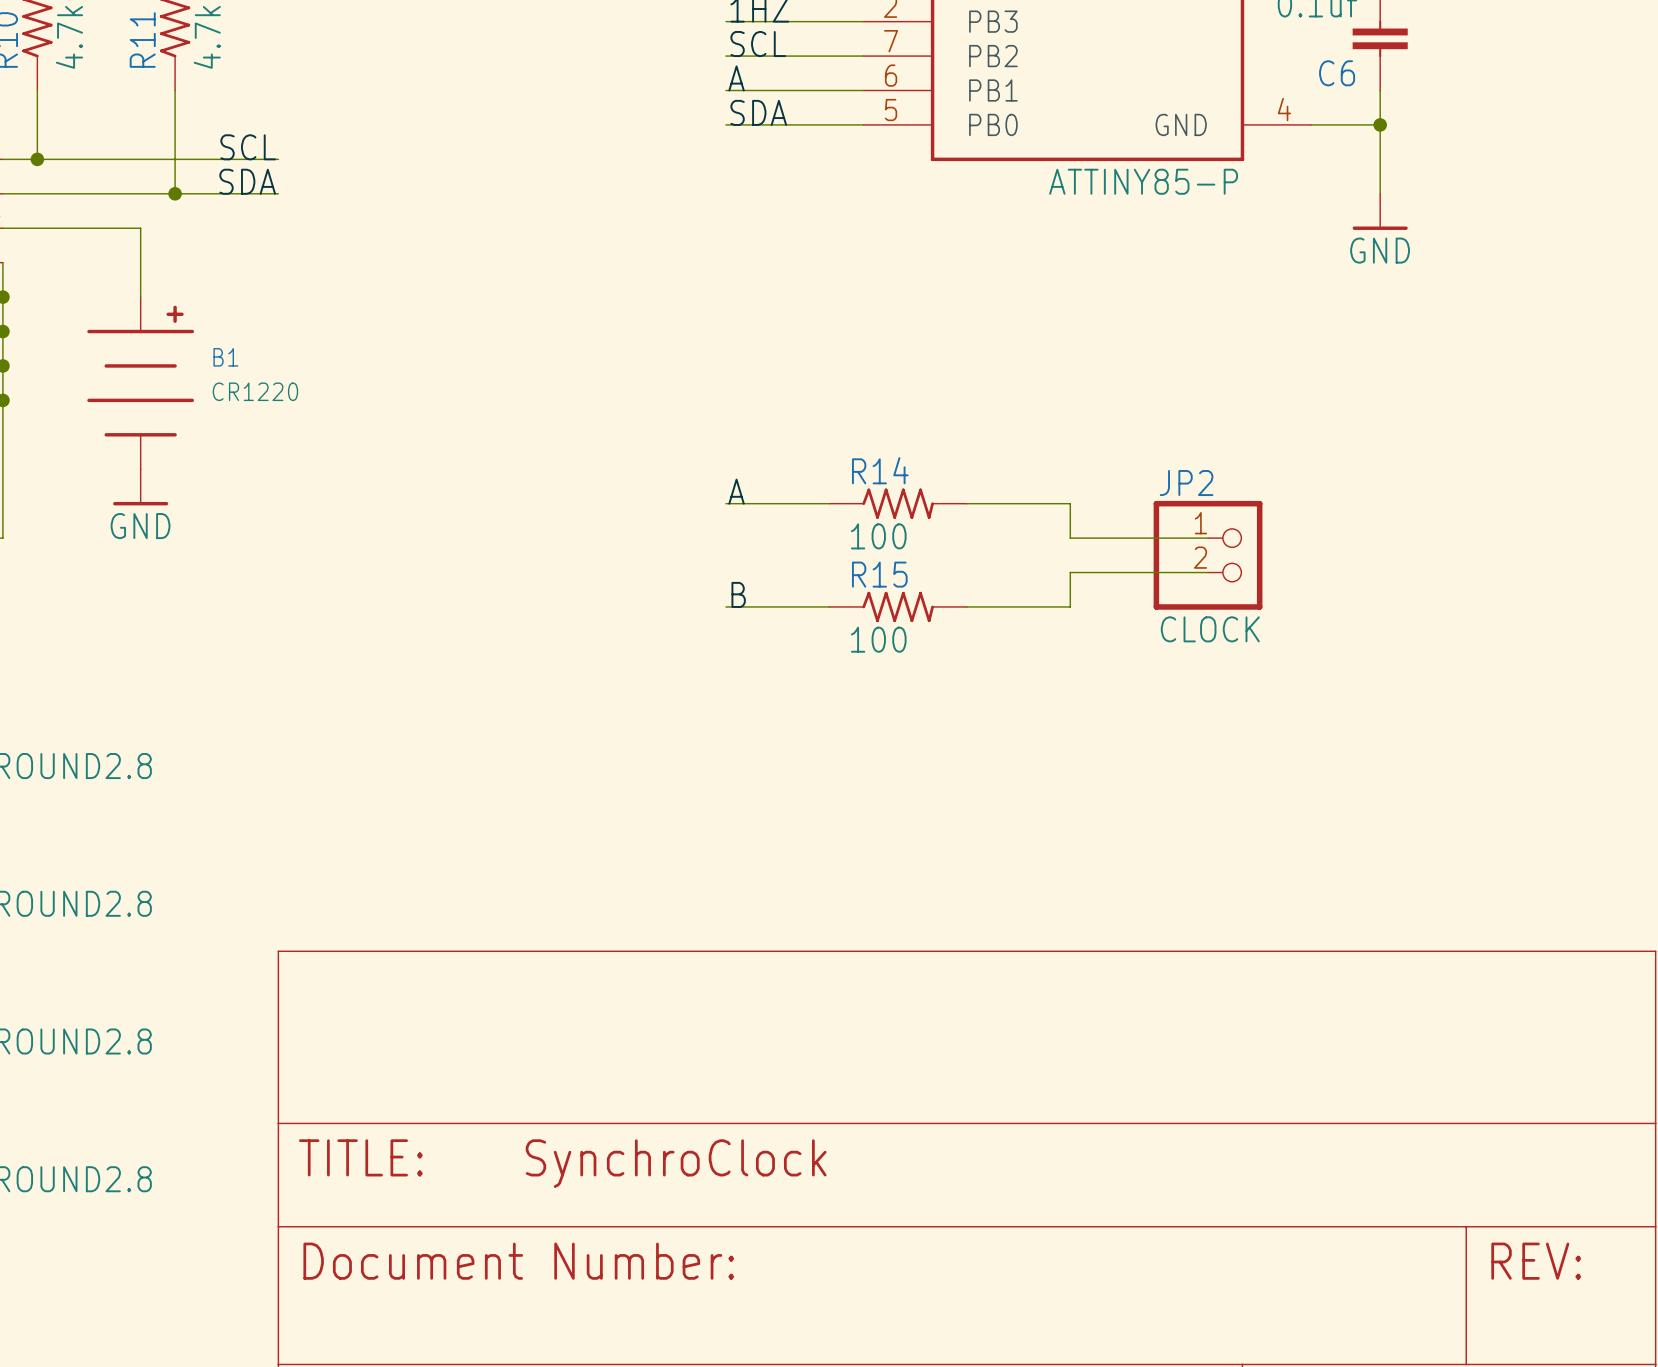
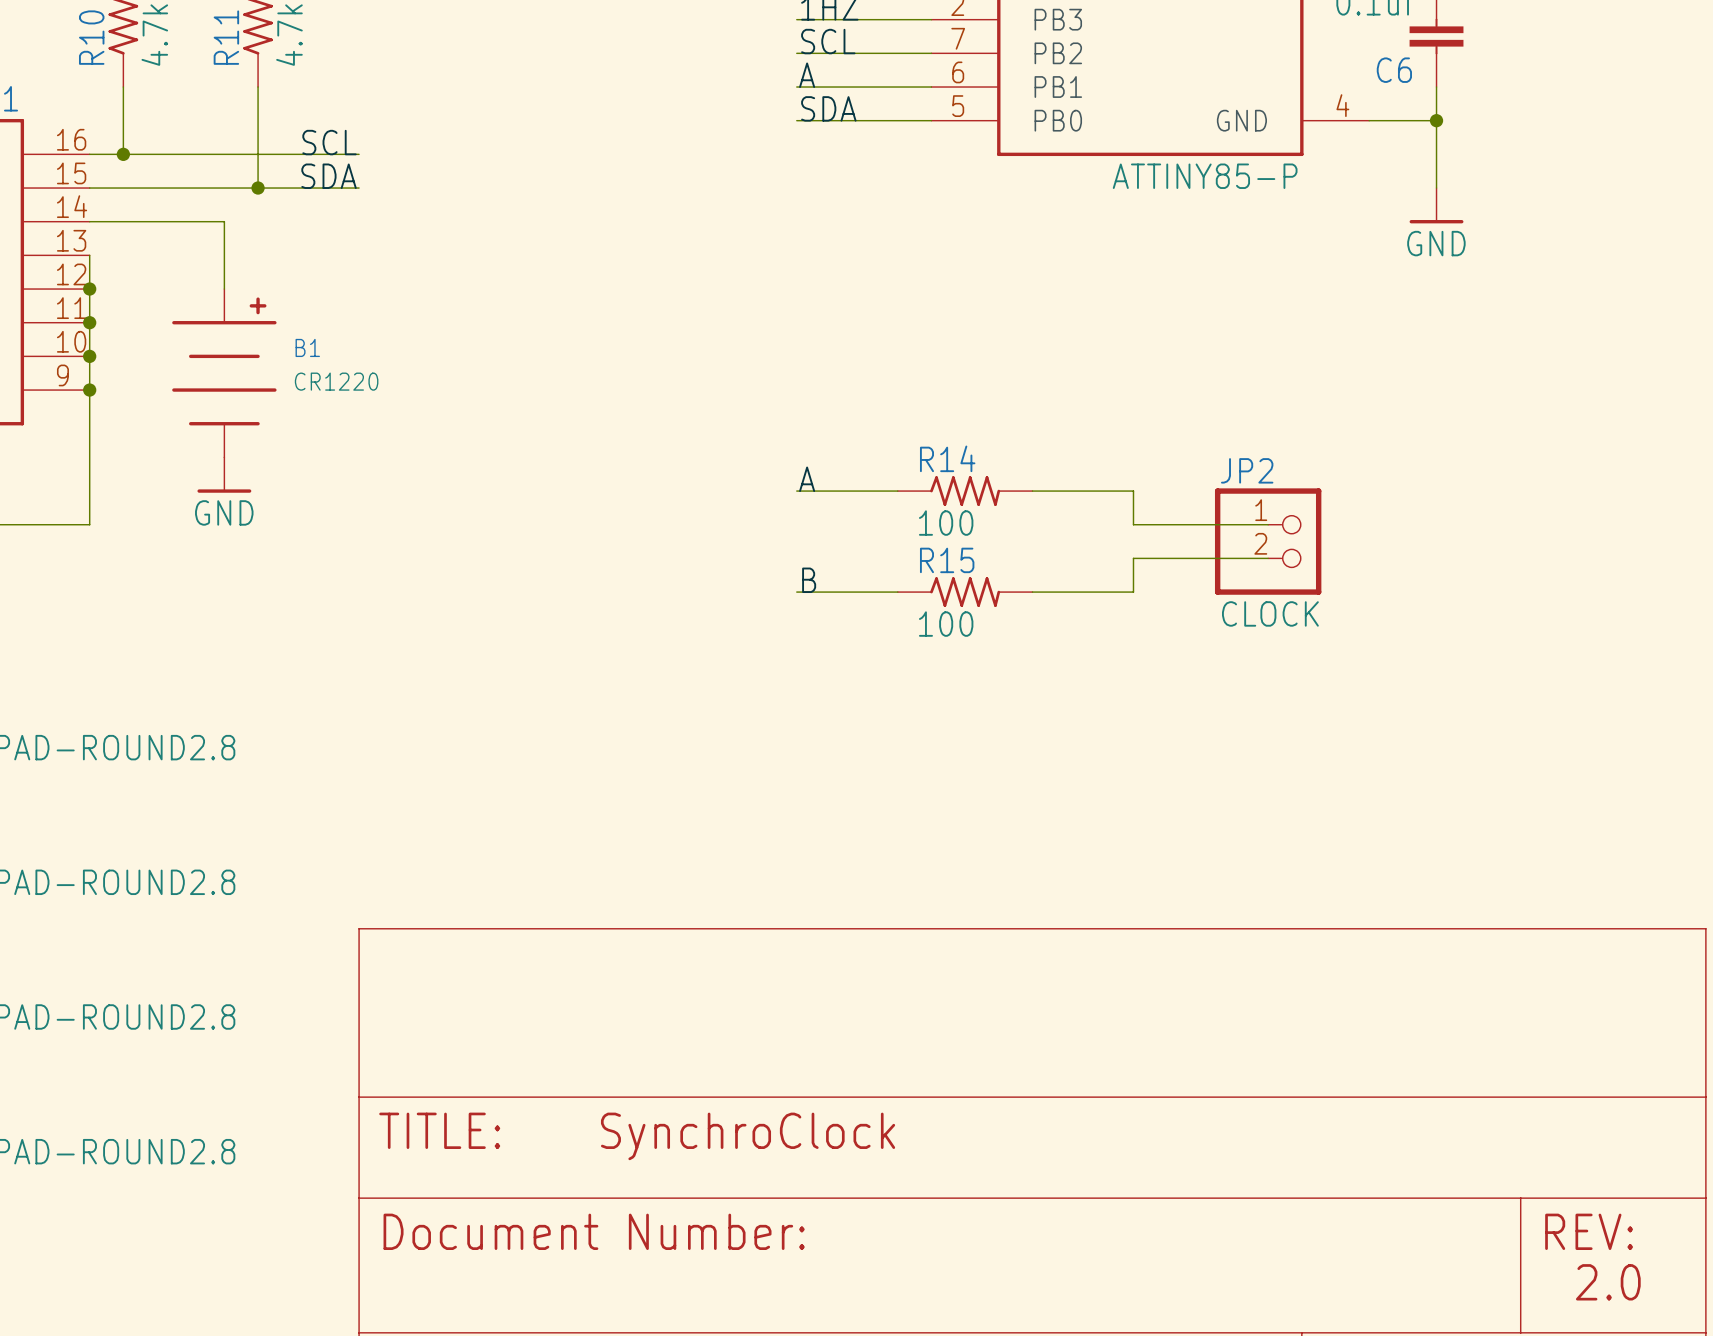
text: none -> 2.0 (1608, 1282)

